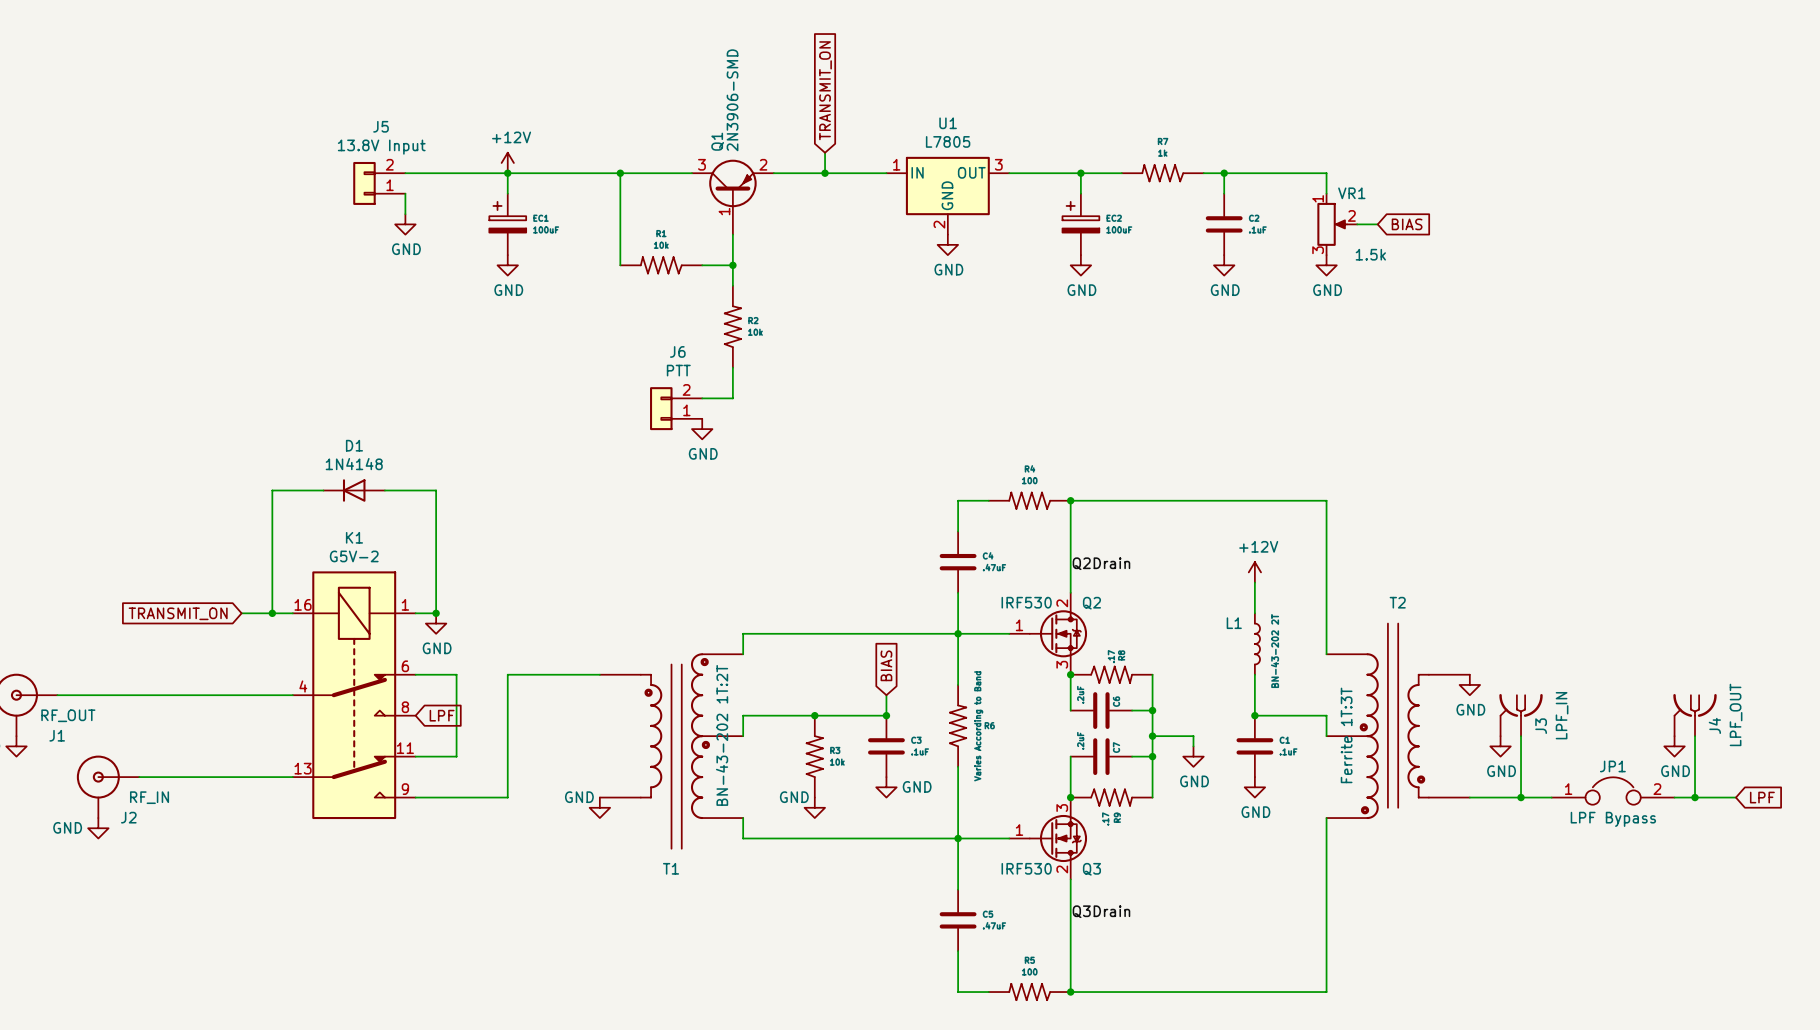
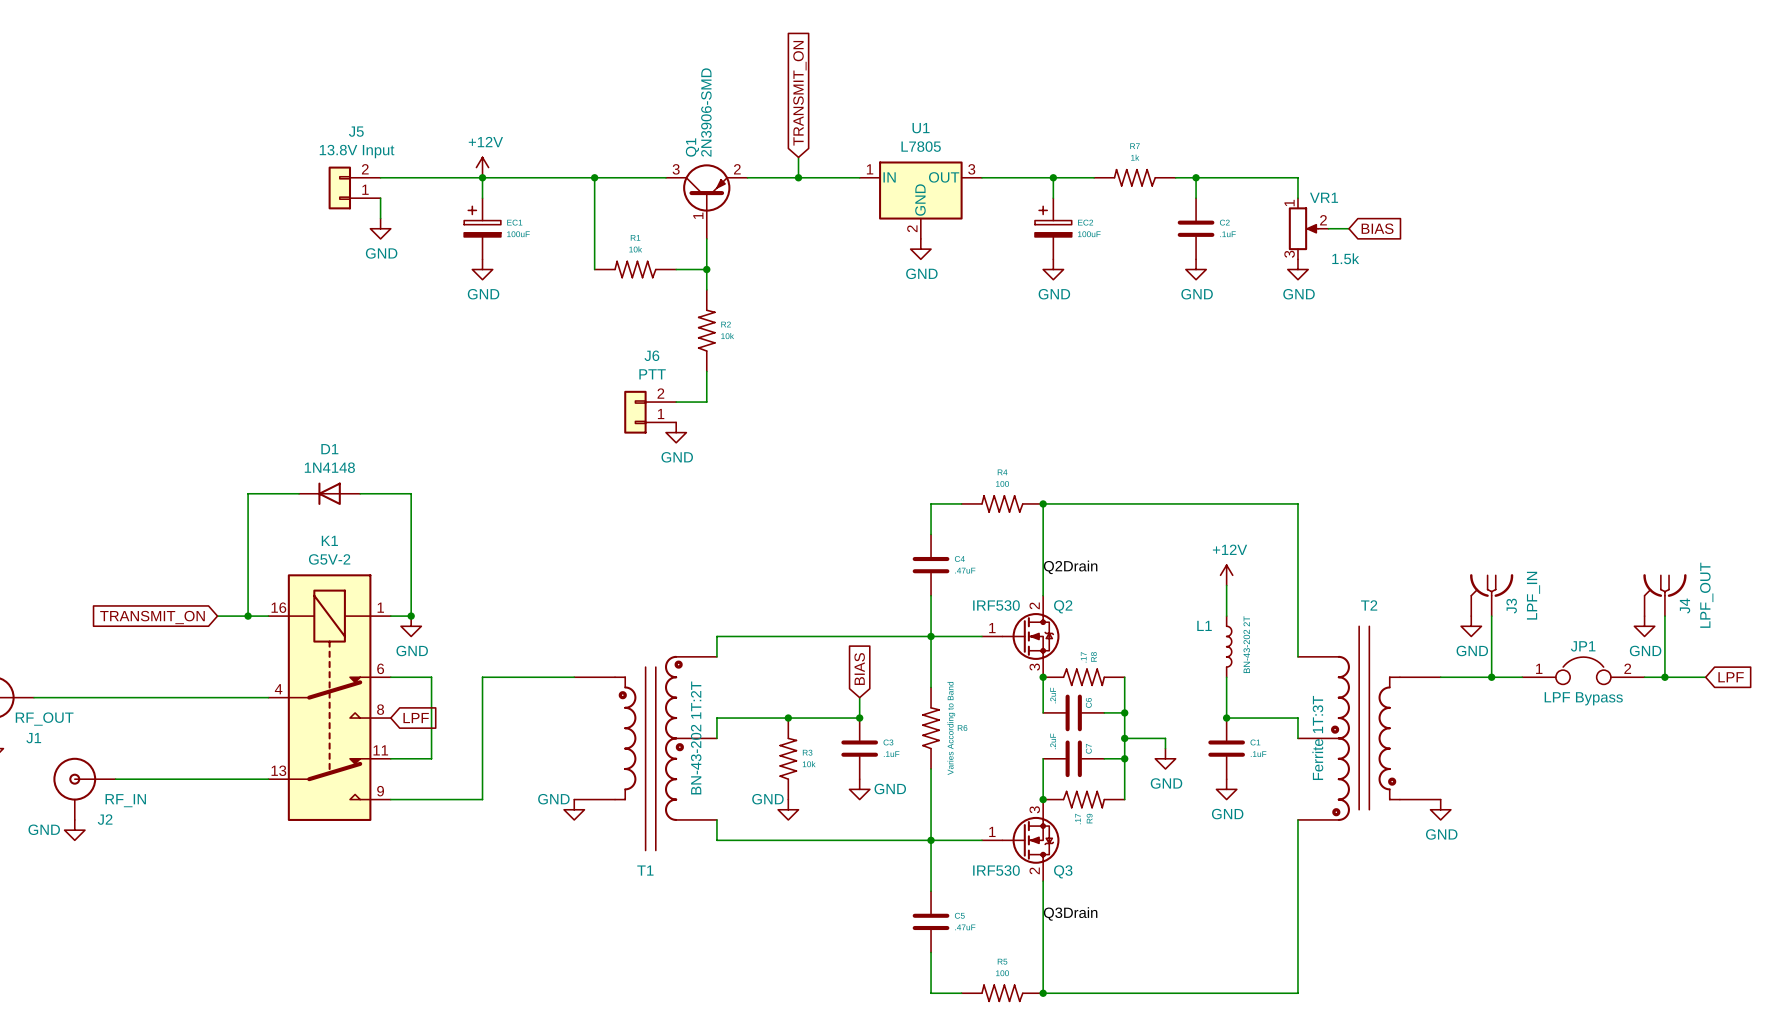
power symbol: none -> GND (1471, 626)
power symbol: none -> GND (1644, 626)
junction: none -> (1491, 677)
junction: none -> (1664, 677)
power symbol: GND (1469, 684) -> none
J3 position: (1521, 715) -> (1491, 595)
J4 position: (1695, 715) -> (1664, 595)
wire: (1521, 736) (1521, 797) -> (1491, 616) (1491, 677)
wire: (1695, 736) (1695, 797) -> (1664, 616) (1664, 677)
power symbol: GND (1500, 746) -> none
power symbol: GND (1674, 746) -> none
JP1 position: (1613, 791) -> (1583, 670)
wire: (1469, 797) (1551, 797) -> (1440, 677) (1522, 677)
junction: (1521, 797) -> none
wire: (1674, 797) (1735, 797) -> (1644, 677) (1705, 677)
junction: (1695, 797) -> none
global label position: LPF (1762, 797) -> LPF (1731, 677)
power symbol: none -> GND (1440, 809)

